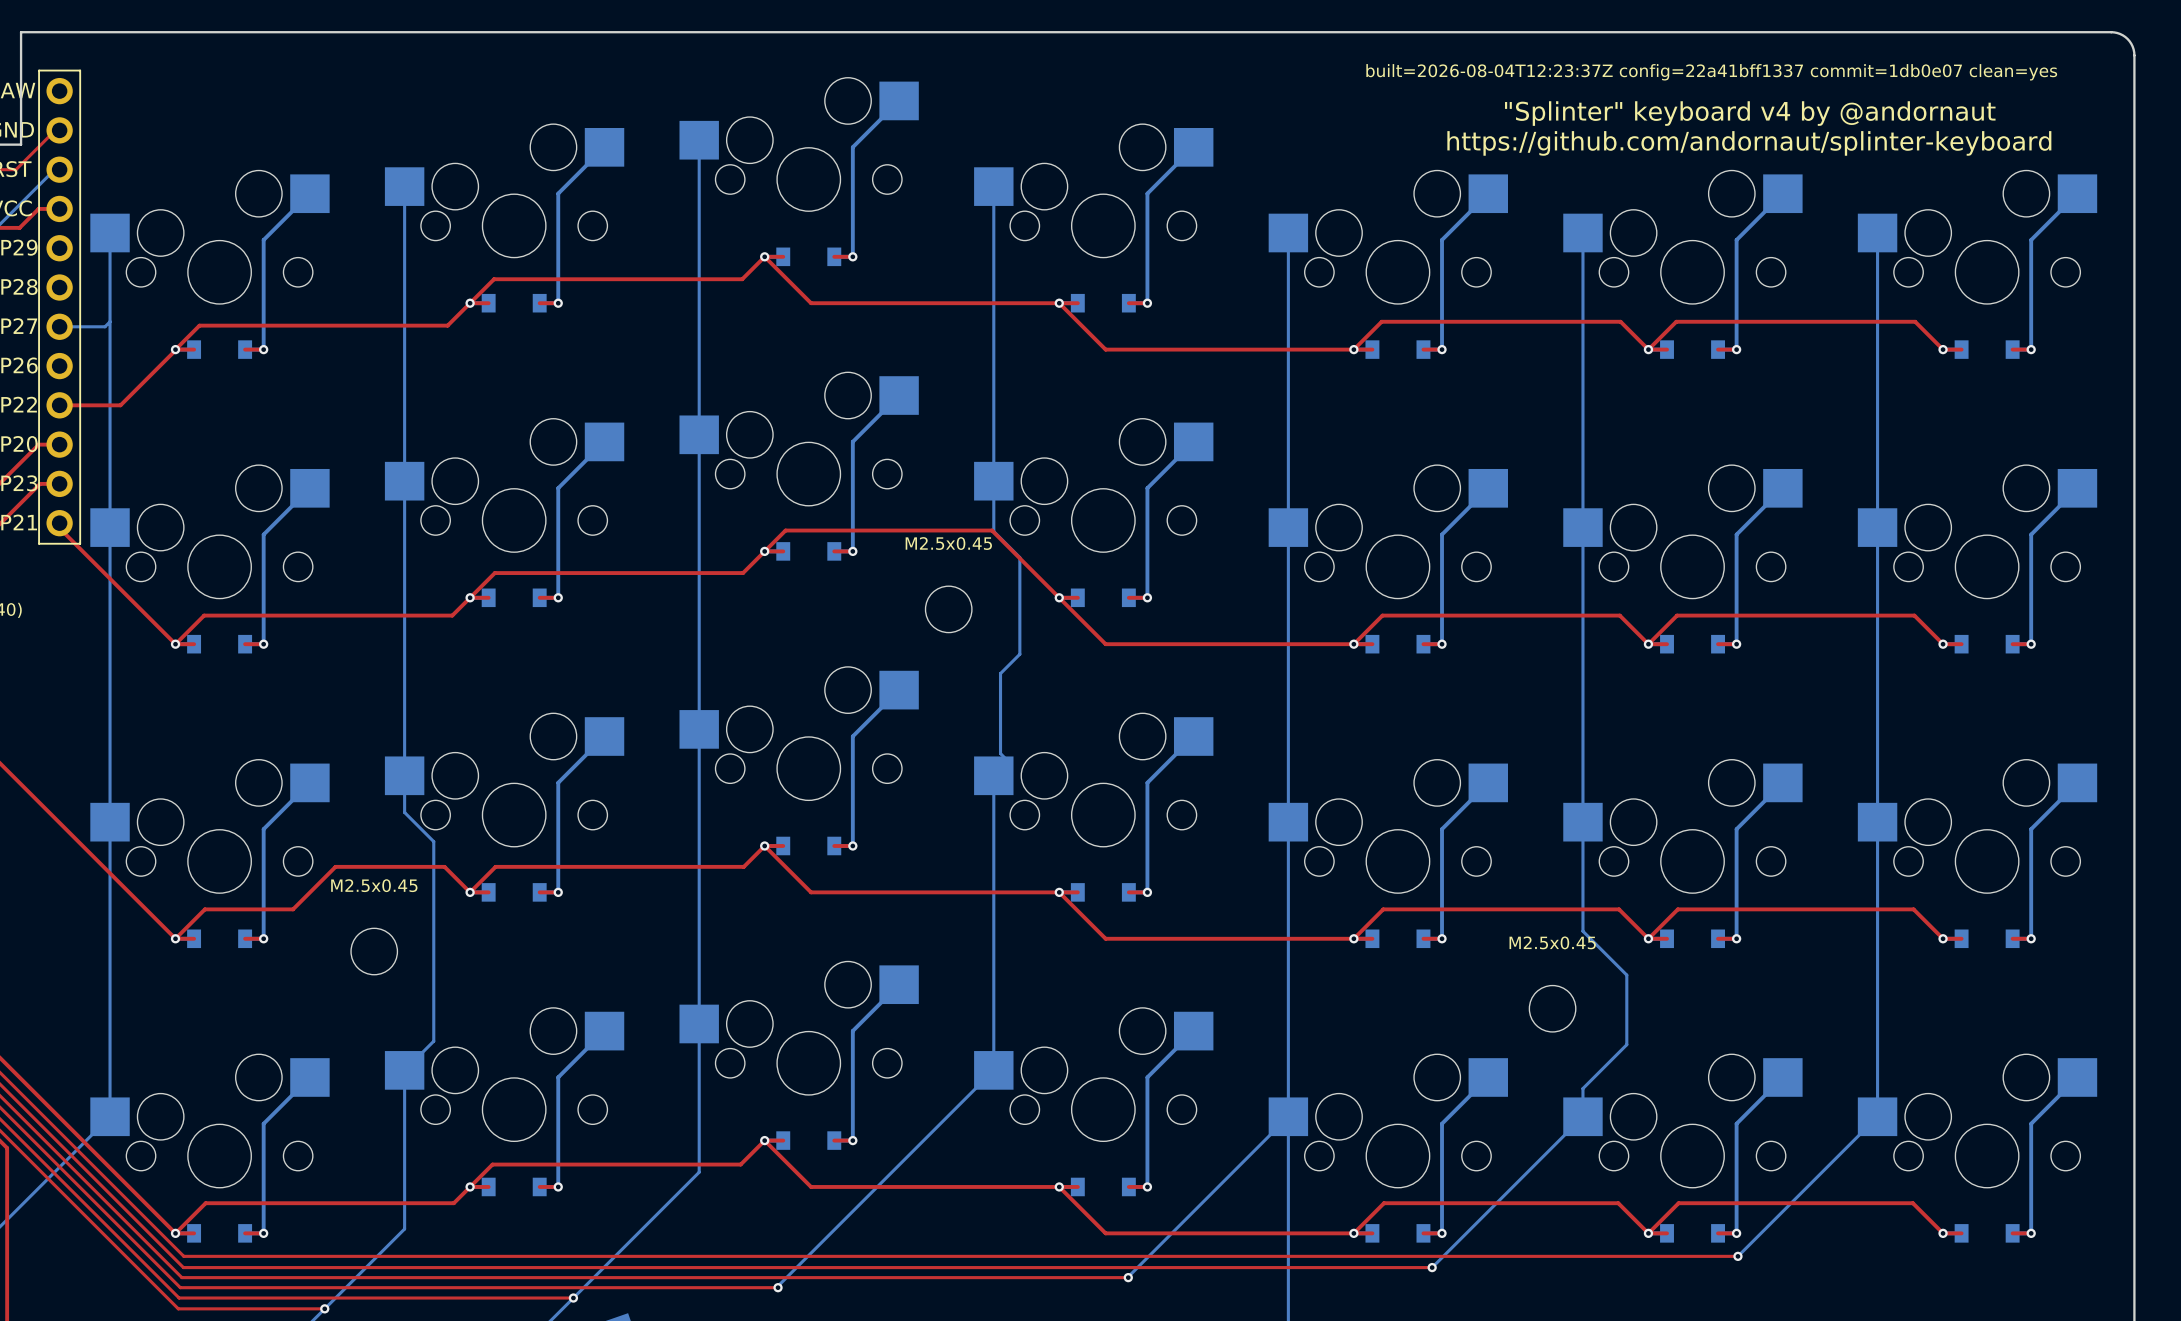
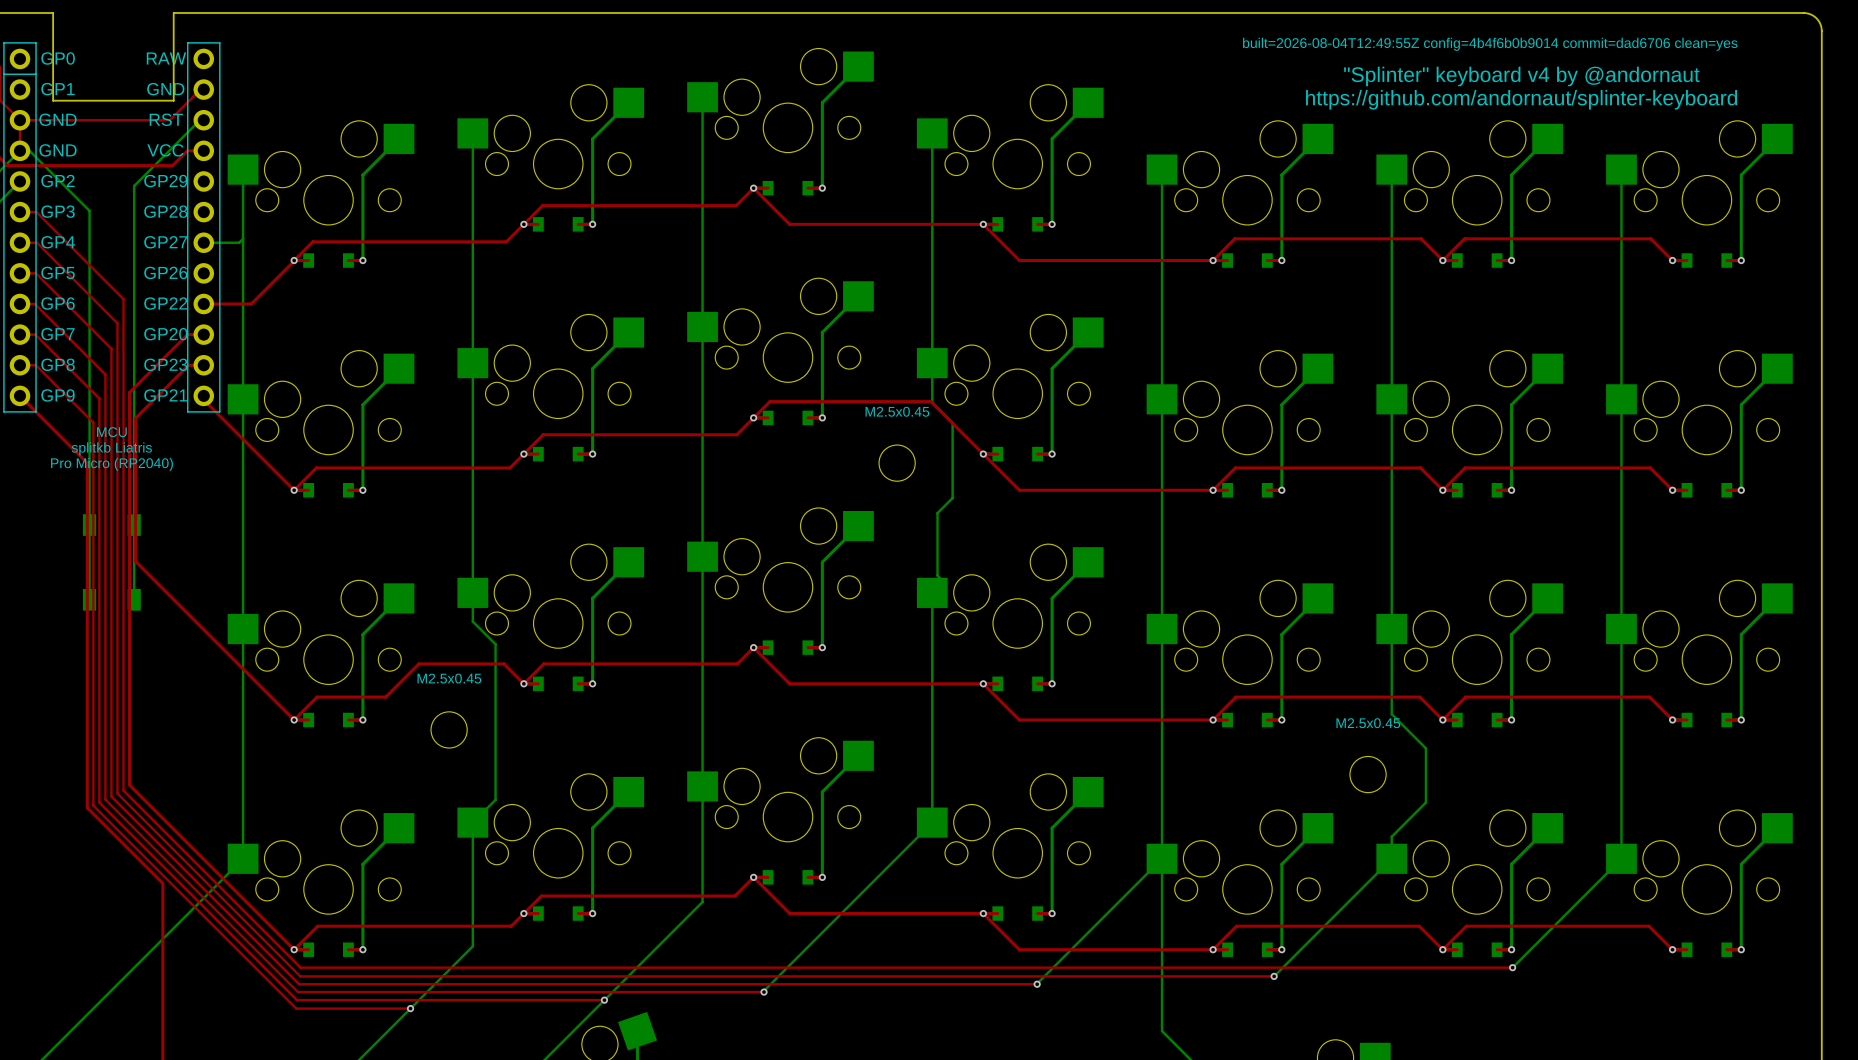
text: built=2026-08-04T12:23:37Z config=22a41bff1337 commit=1db0e07 clean=yes (1711, 72) -> built=2026-08-04T12:49:55Z config=4b4f6b0b9014 commit=dad6706 clean=yes (1490, 44)

